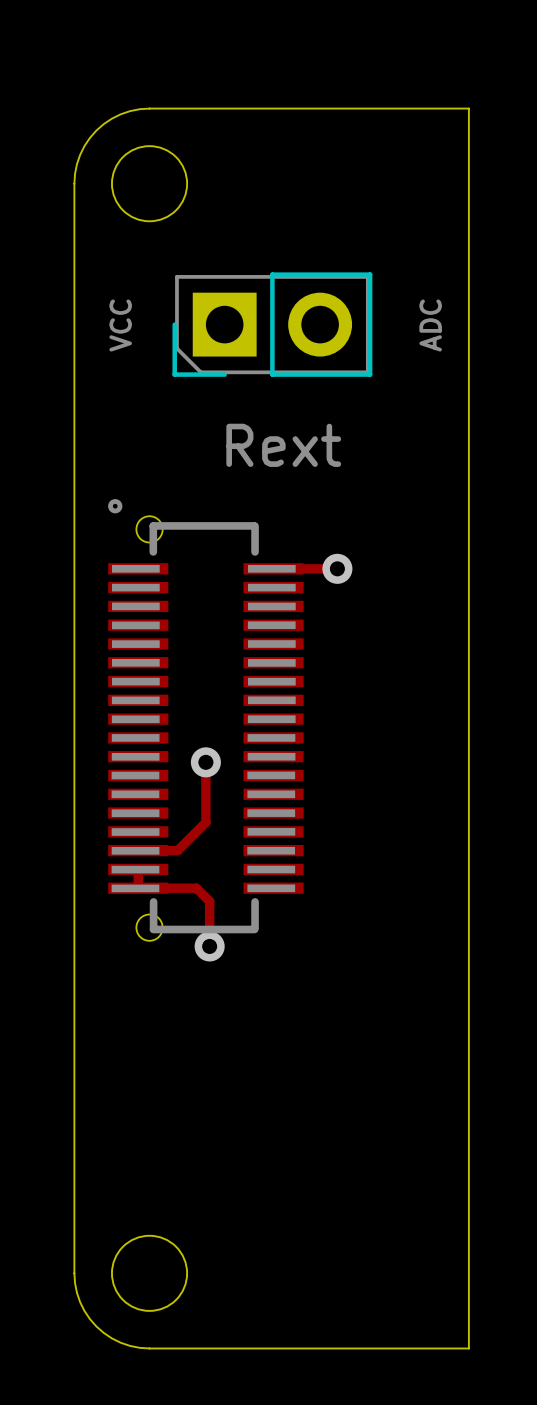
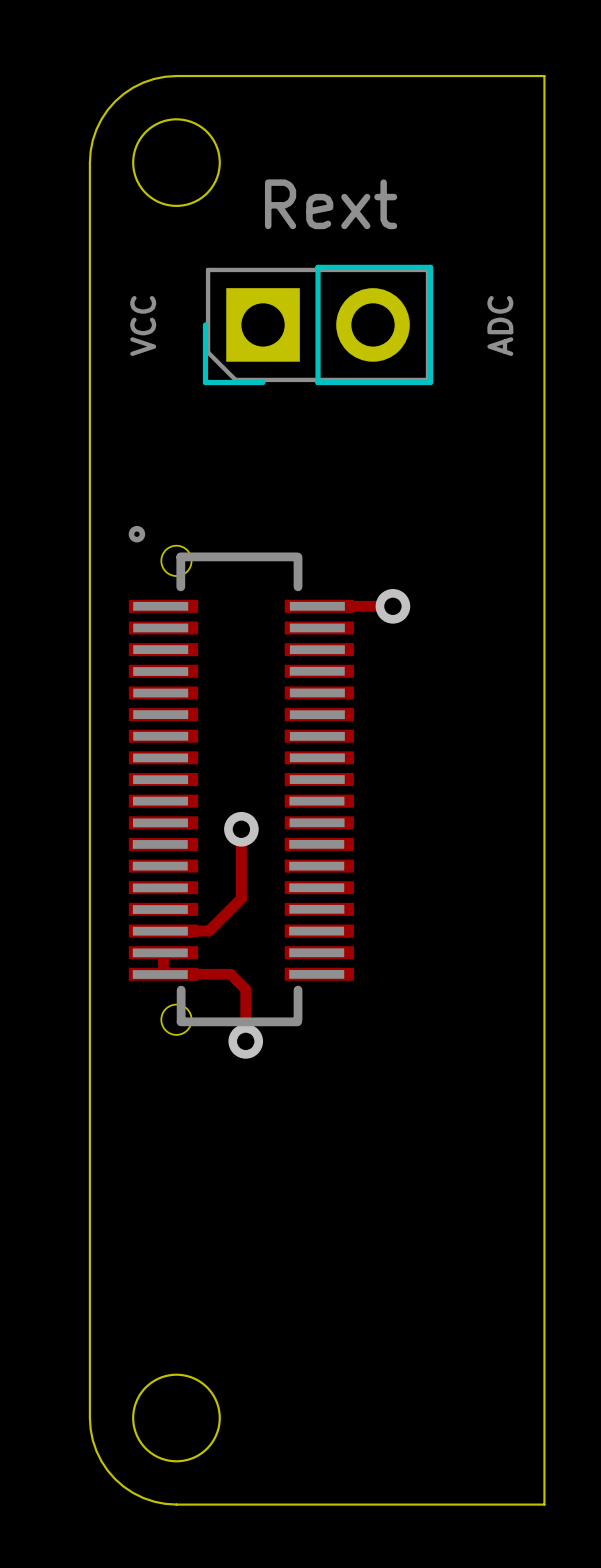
part value position: Rext (283, 445) -> Rext (331, 204)

